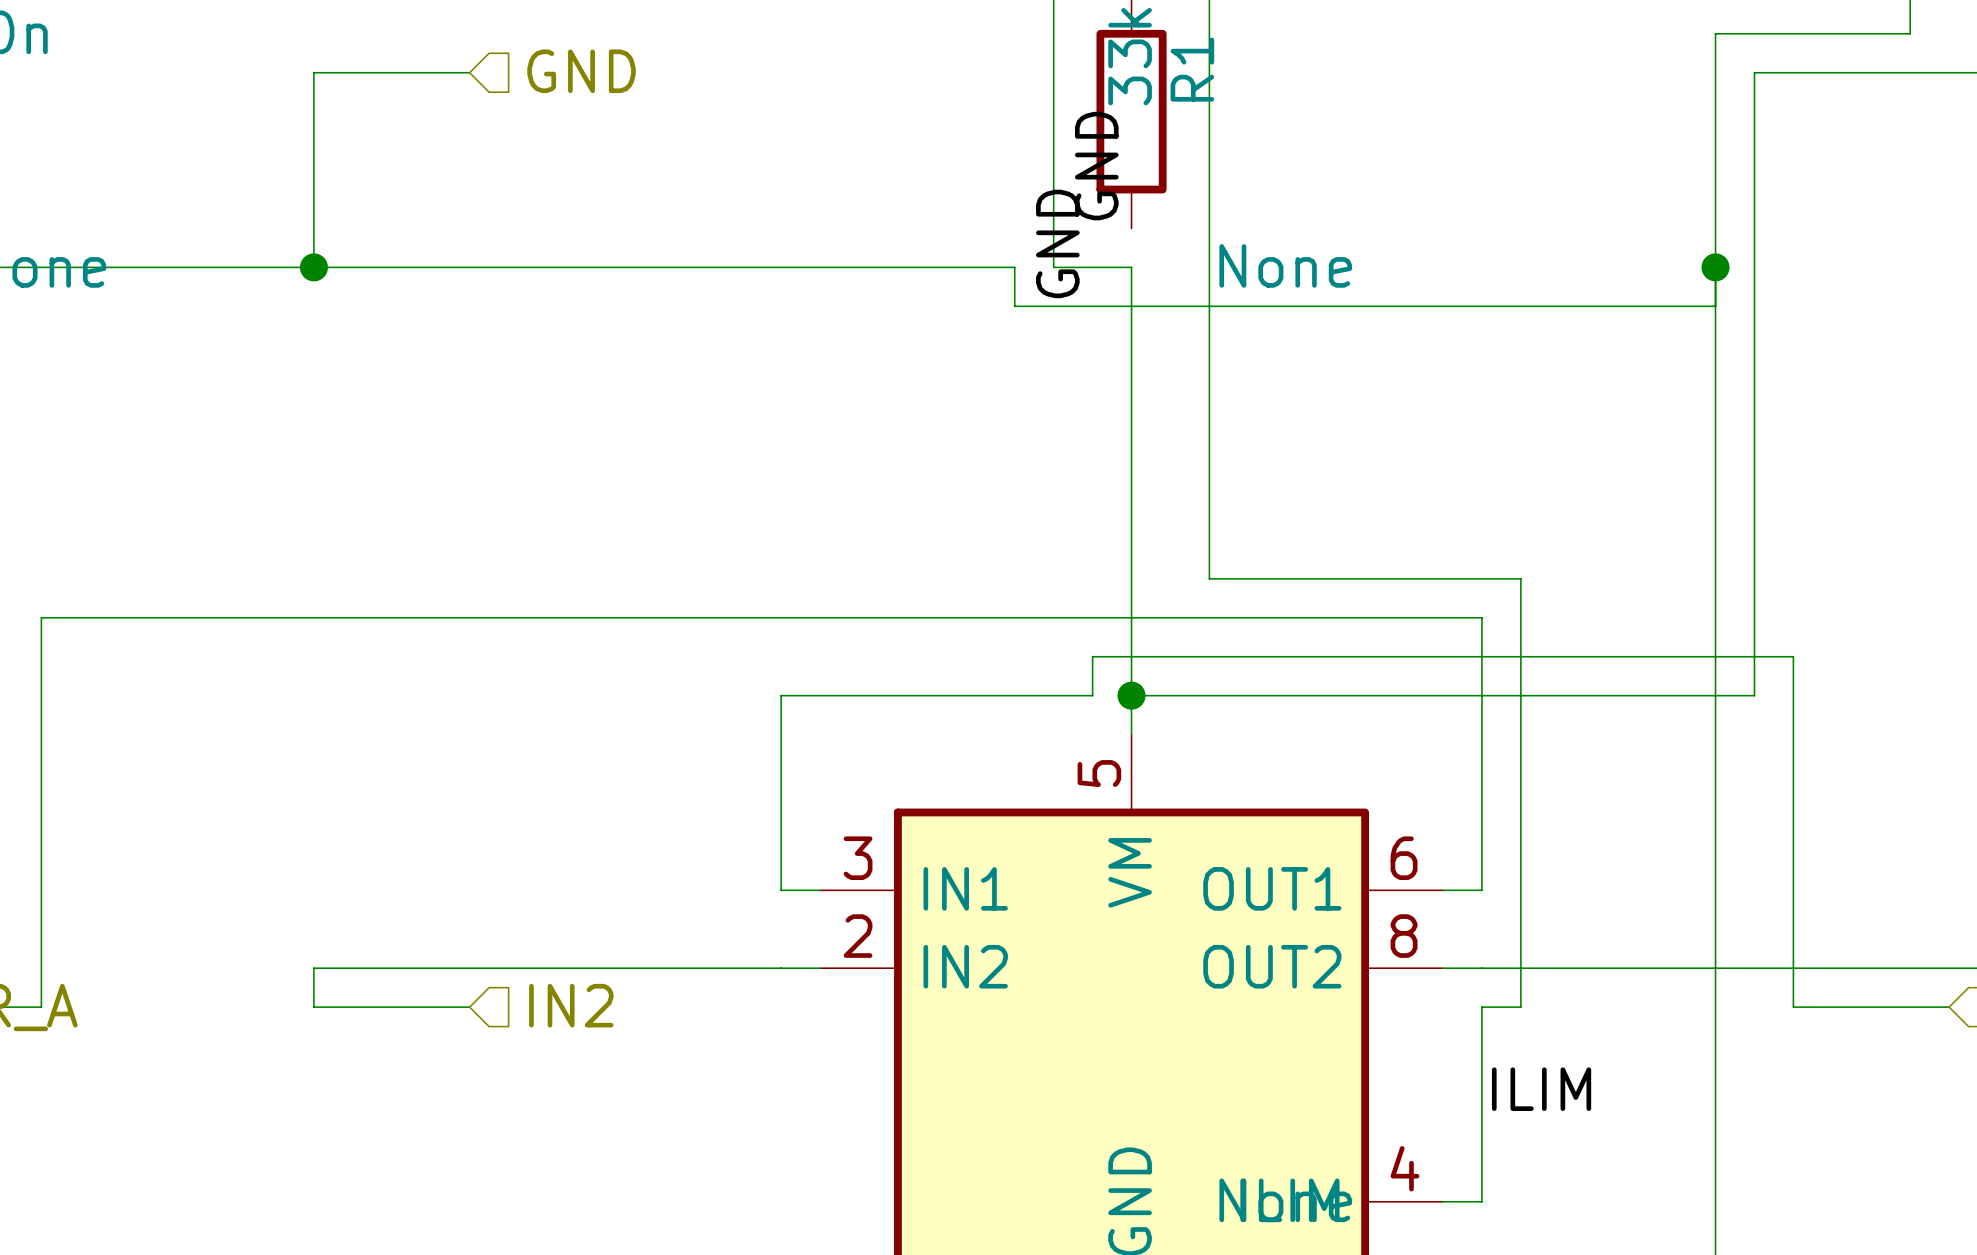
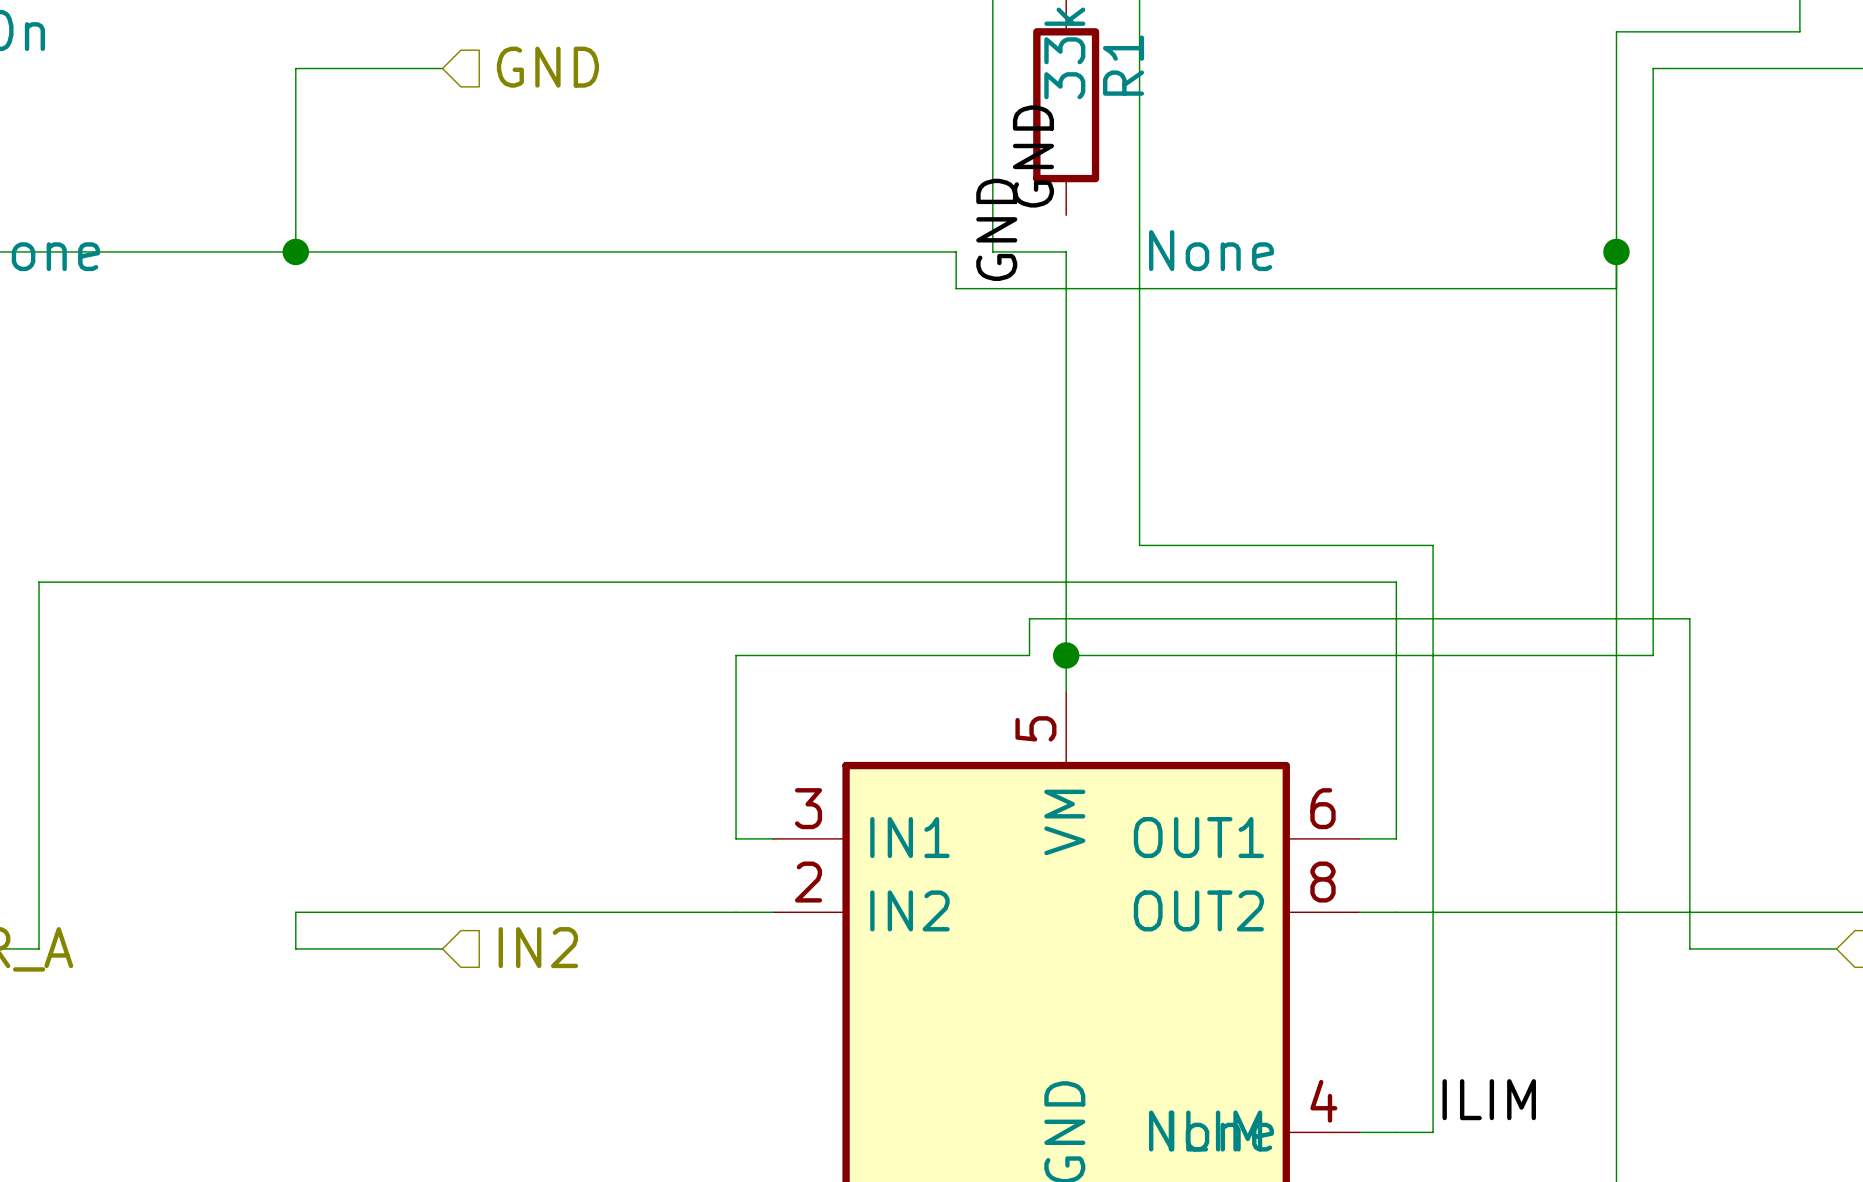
wire: (1520, 1007) (1481, 1007) (1481, 1201) -> (1433, 948) (1433, 1132) (1396, 1132)
label position: ILIM (1541, 1089) -> ILIM (1489, 1099)

